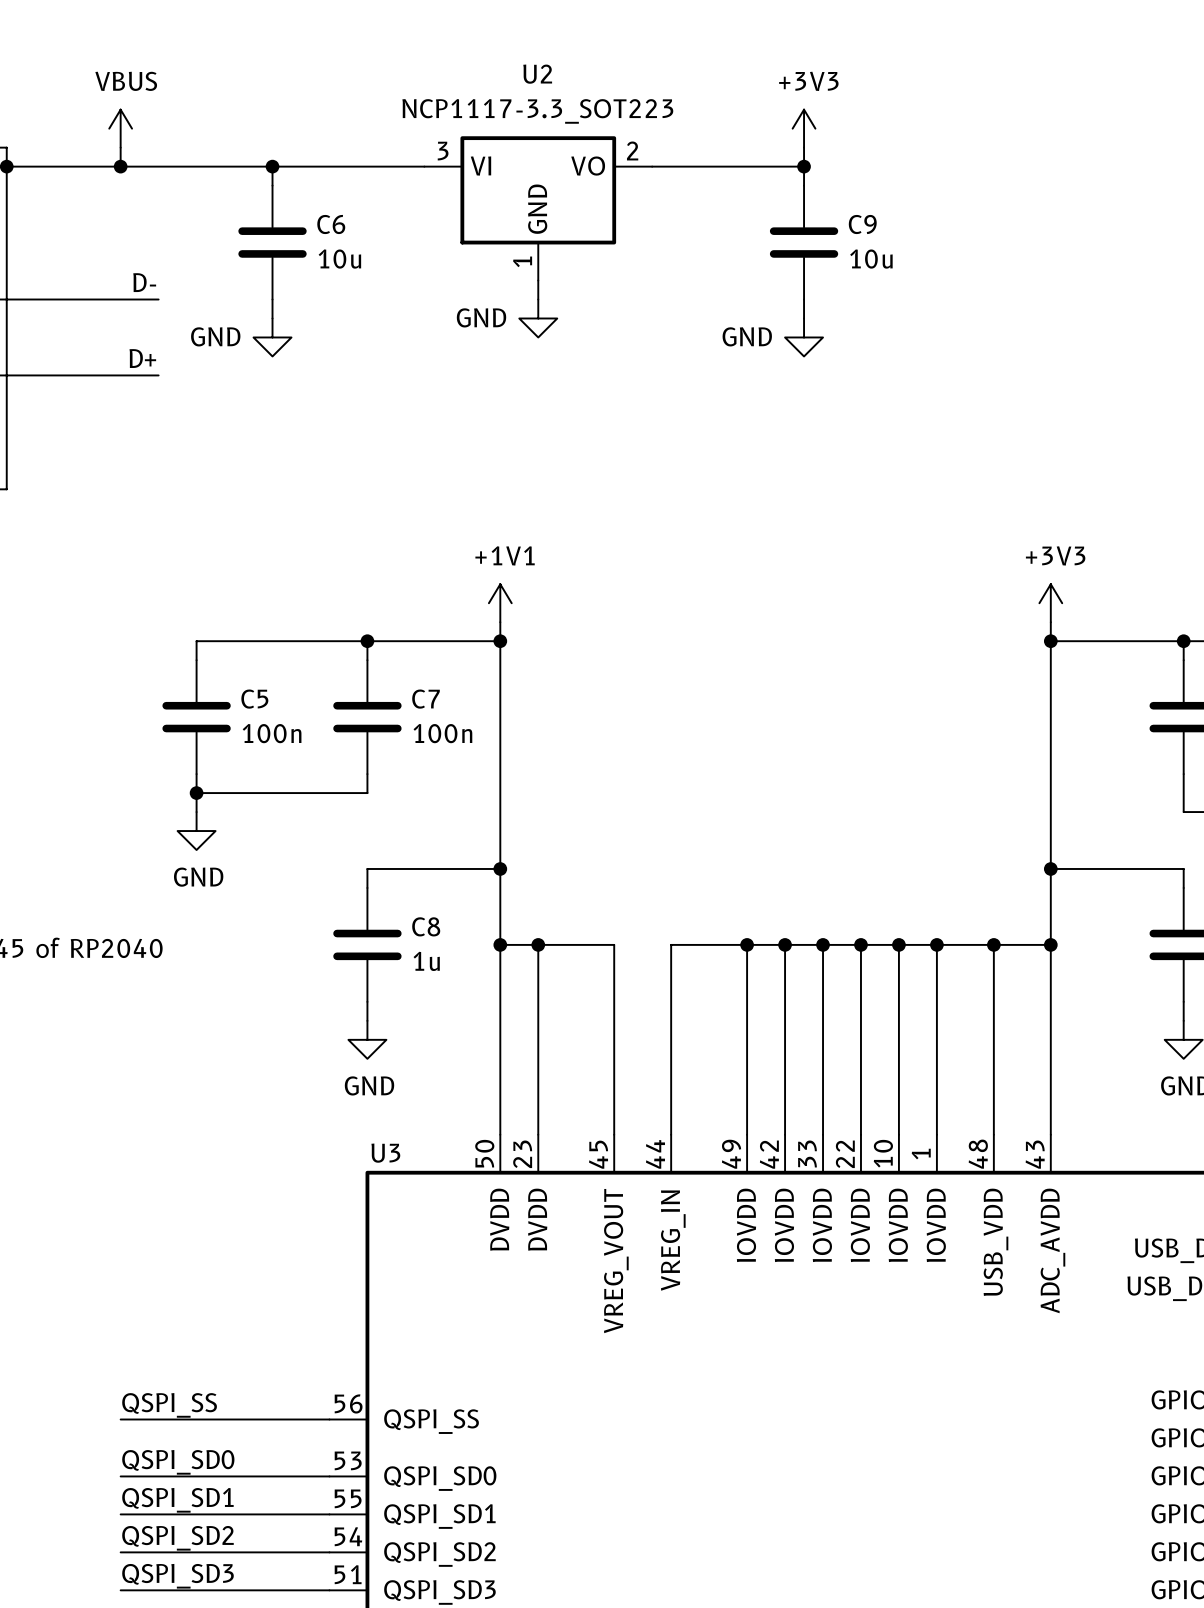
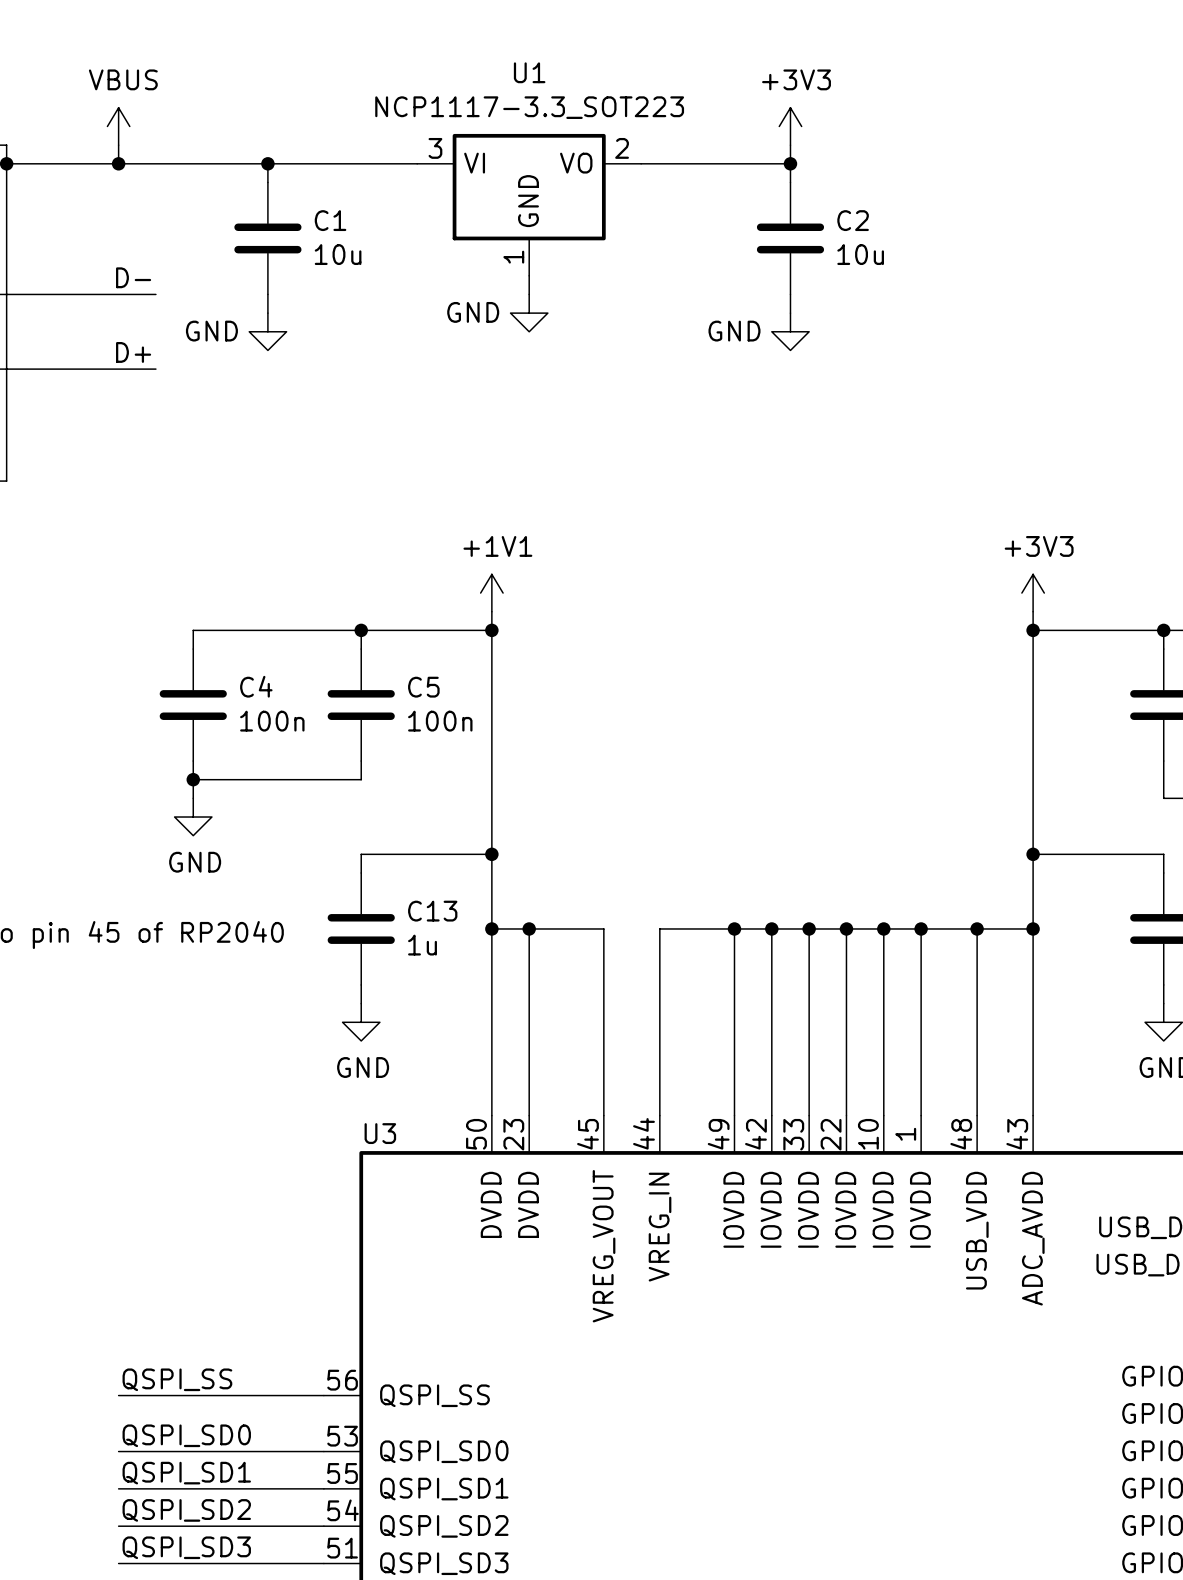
U2 name: U2 (537, 74) -> U1 (529, 72)
C6 name: C6 (331, 224) -> C1 (330, 220)
C9 name: C9 (862, 224) -> C2 (853, 220)
C5 name: C5 (254, 699) -> C4 (256, 686)
C7 name: C7 (426, 699) -> C5 (423, 687)
C8 name: C8 (426, 926) -> C13 (432, 911)

